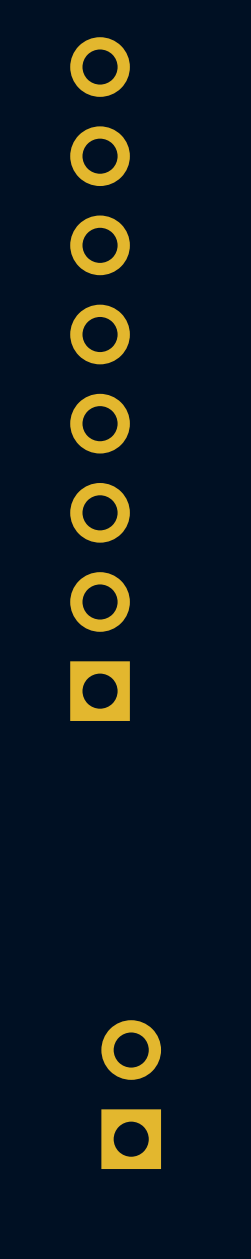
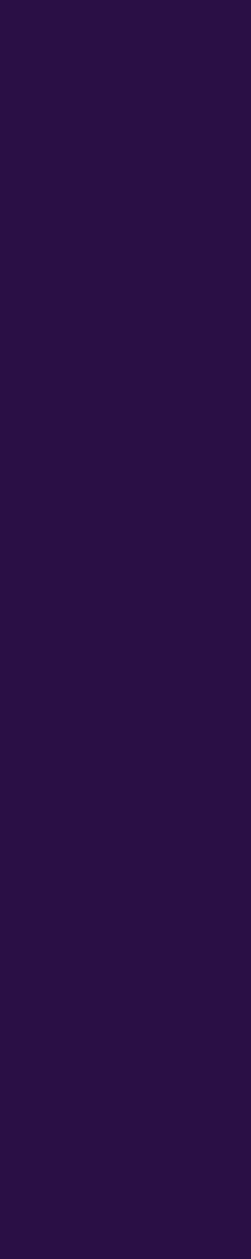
part: (100, 379) -> none
part: (131, 1094) -> none

